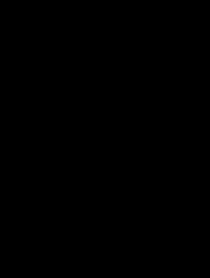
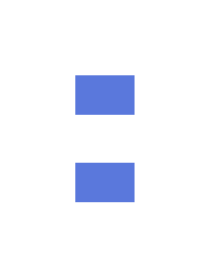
part: none -> (104, 138)

